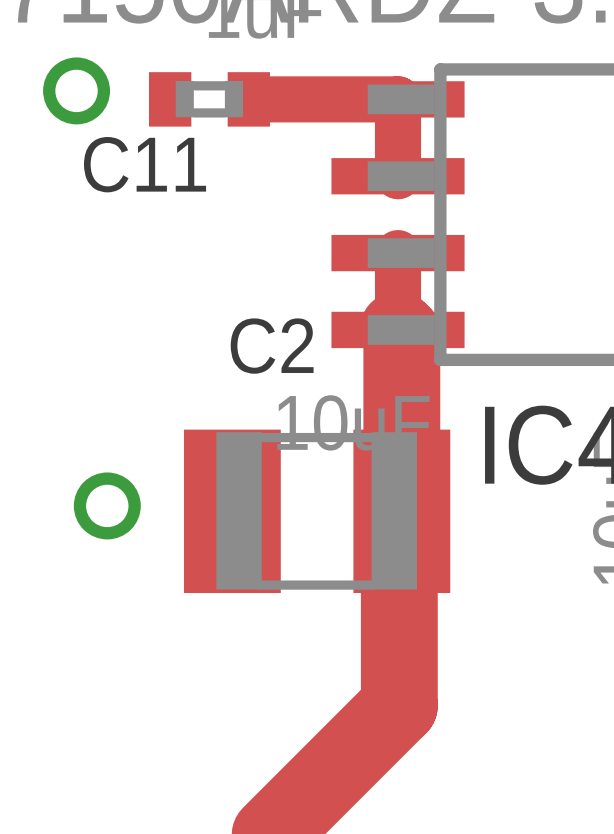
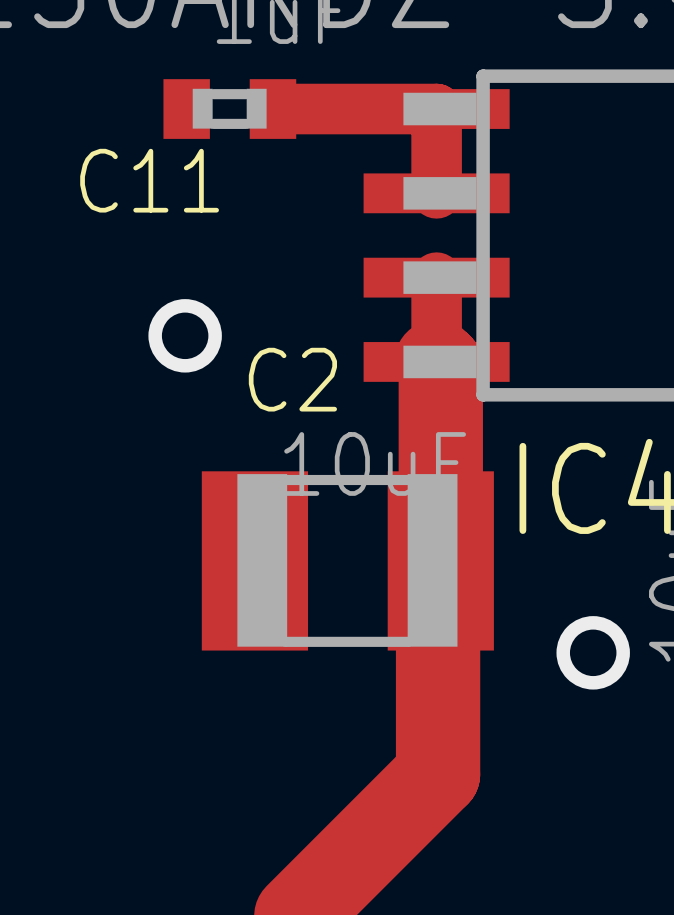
via: (76, 90) -> none
via: none -> (185, 335)
via: (107, 505) -> none
via: none -> (593, 652)

